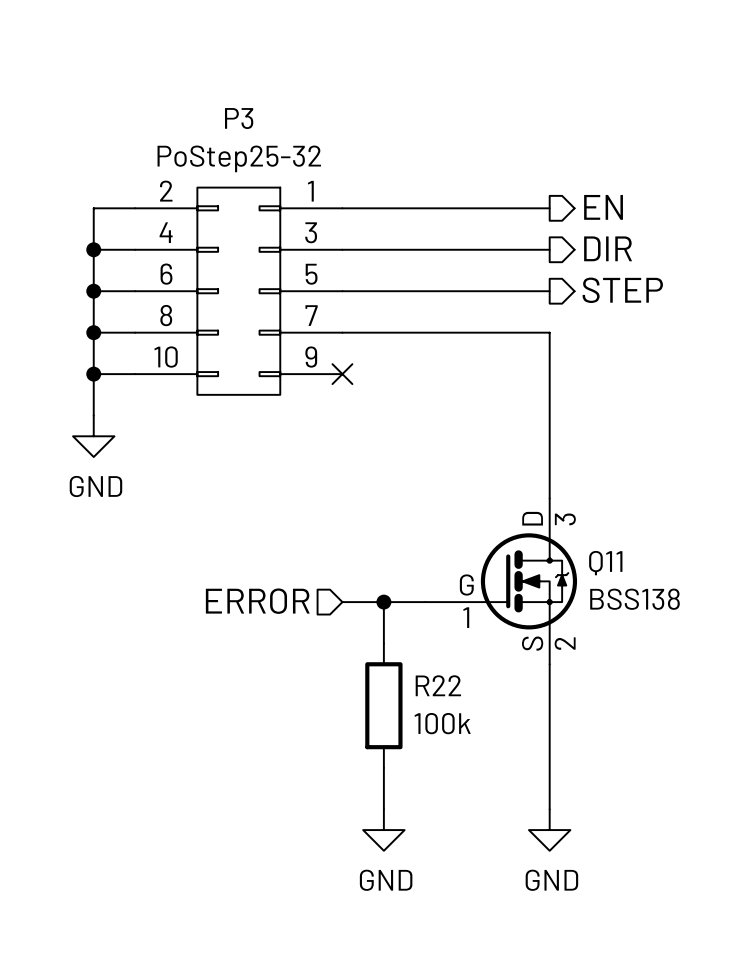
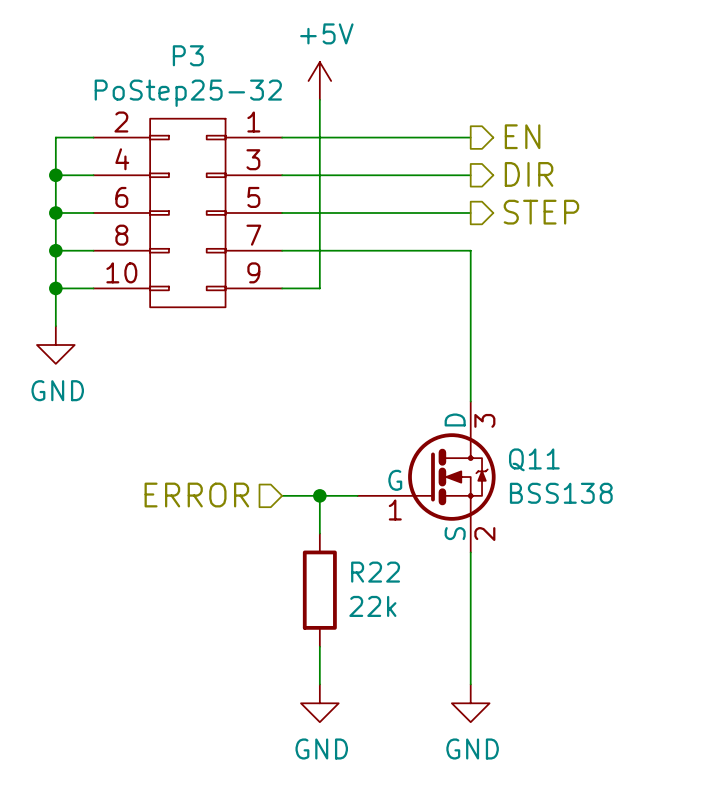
power symbol: none -> +5V (319, 80)
wire: none -> (319, 99) (319, 288) (282, 288)
no-connect mark: (342, 374) -> none
R22 value: 100k (442, 723) -> 22k (372, 606)

